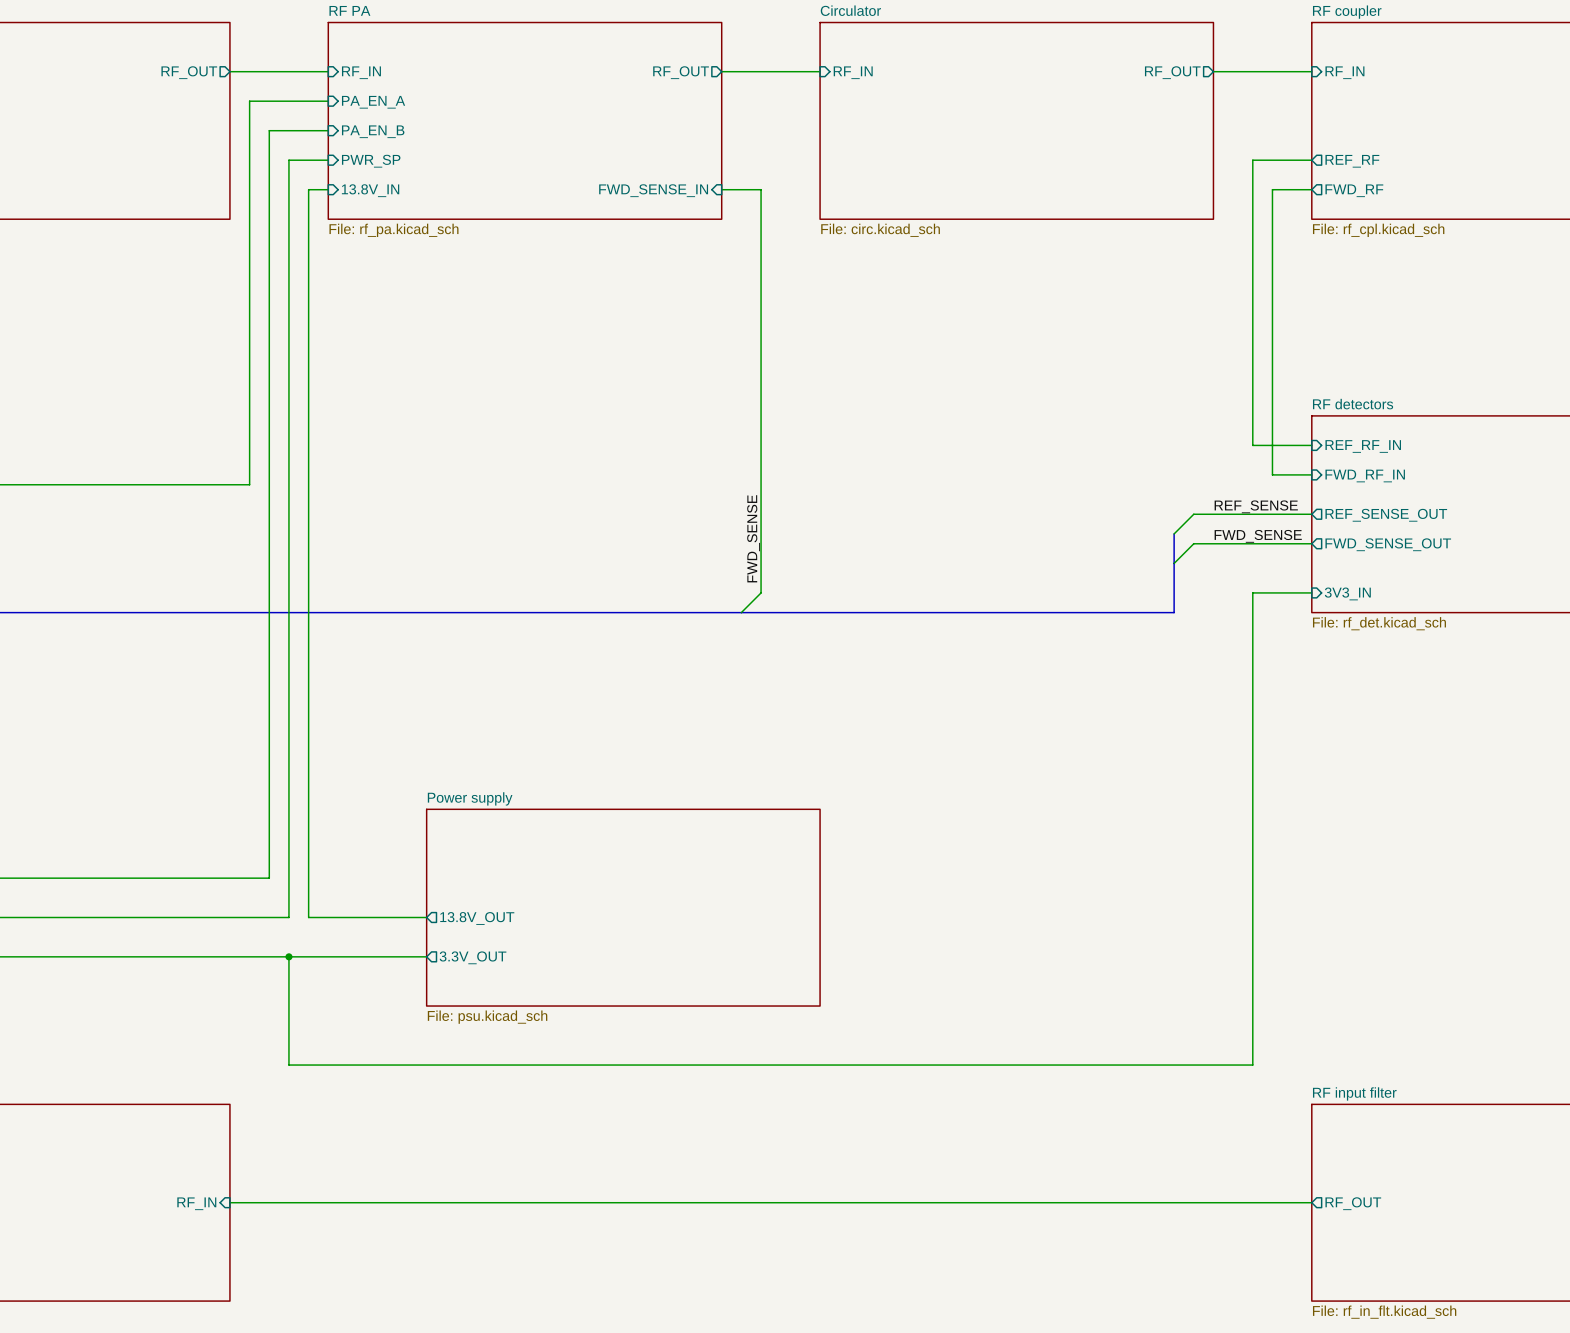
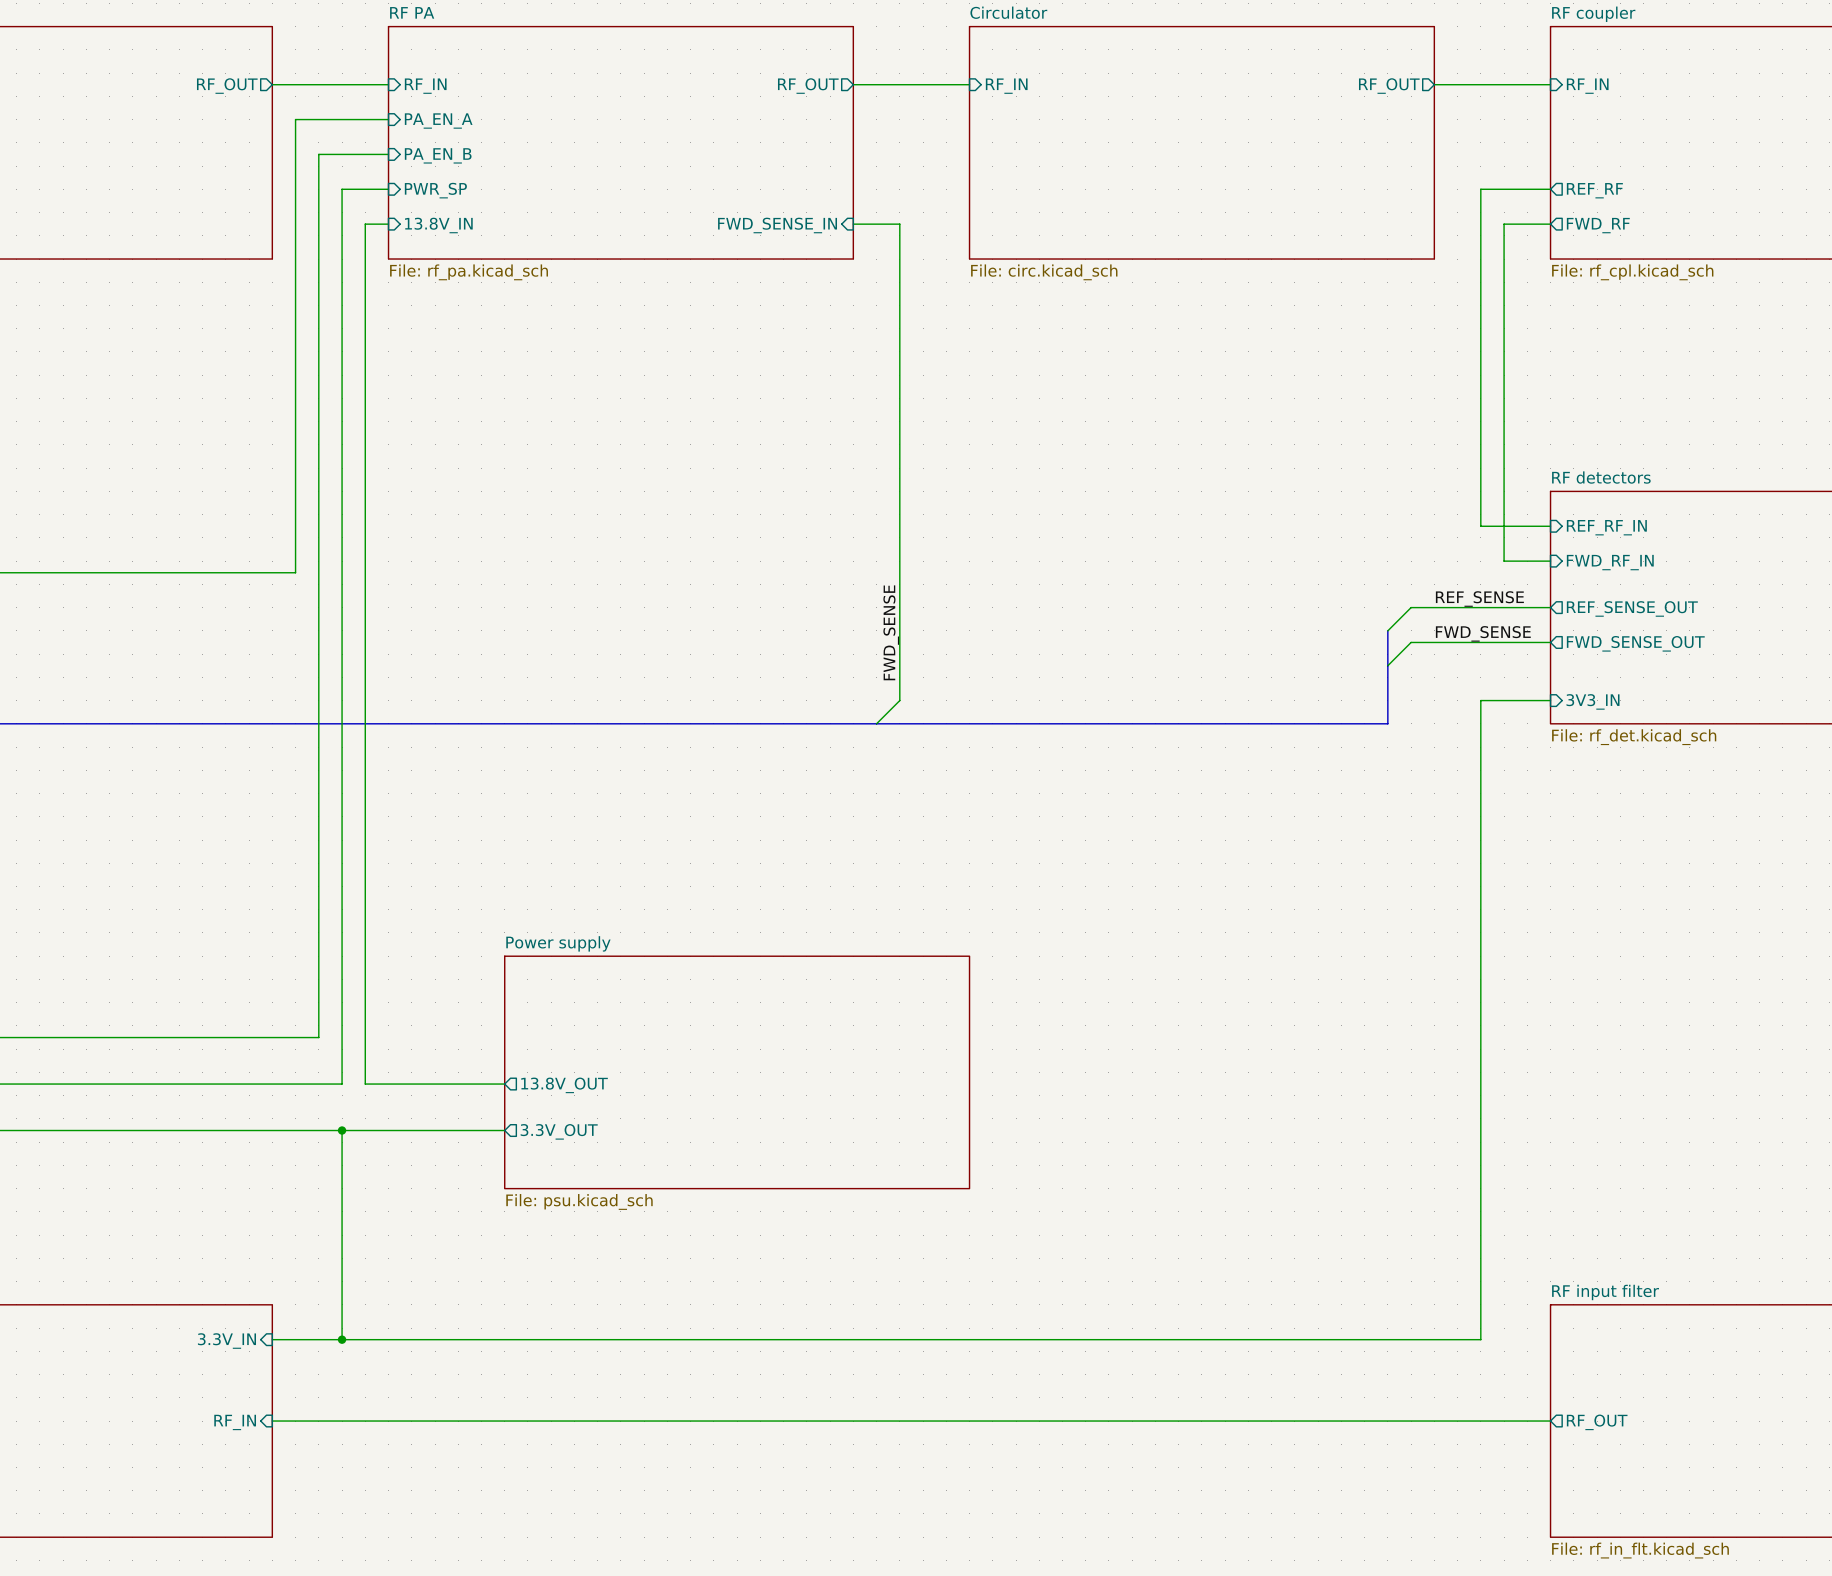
wire: (288, 1065) (1252, 1065) -> (272, 1339) (1480, 1339) (1480, 1258)
wire: none -> (342, 1258) (342, 1339)
junction: none -> (342, 1339)
sheet pin: none -> 3.3V_IN (226, 1341)

